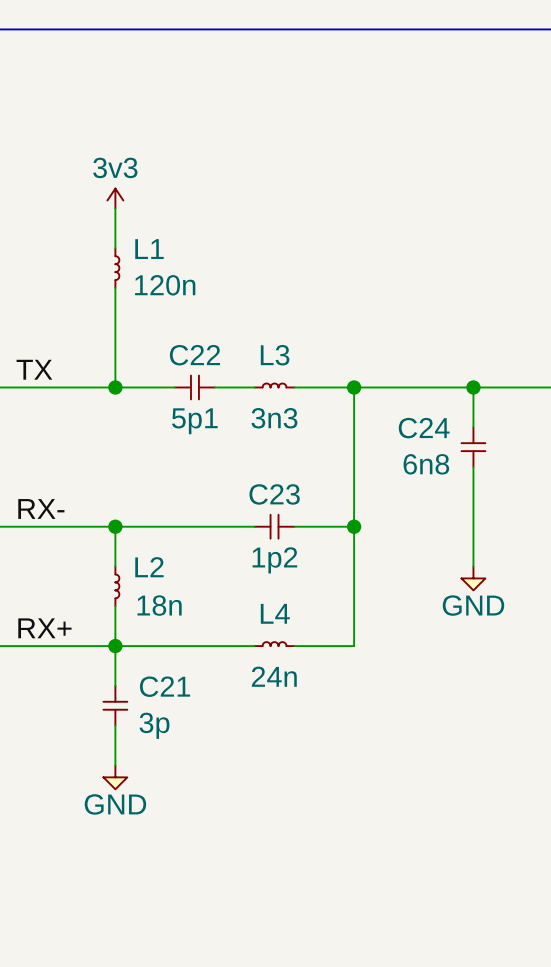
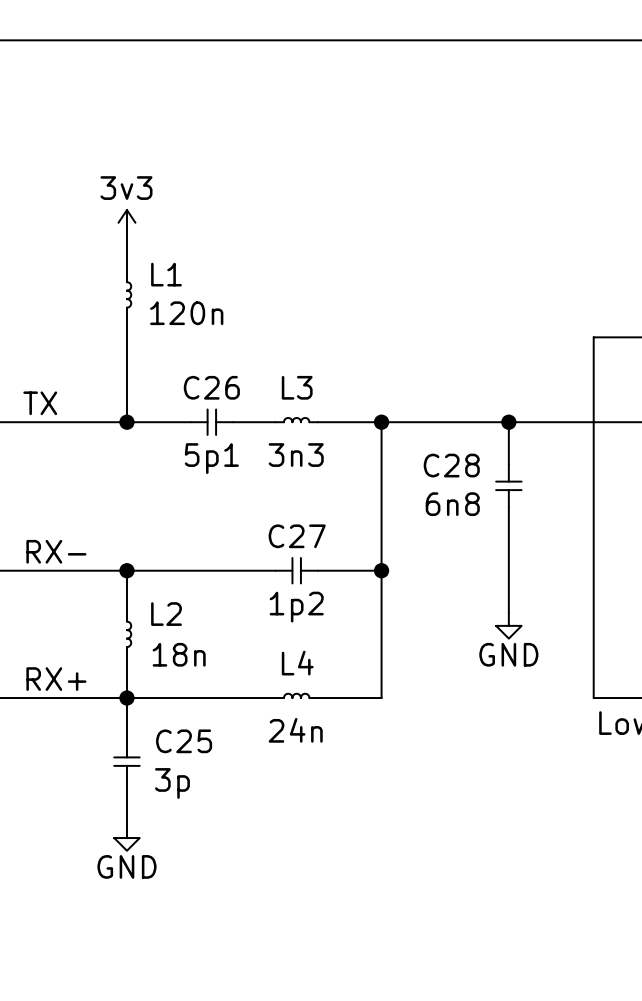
C22 name: C22 (194, 355) -> C26 (211, 387)
C24 name: C24 (424, 428) -> C28 (451, 465)
C23 name: C23 (274, 494) -> C27 (297, 536)
C21 name: C21 (165, 686) -> C25 (184, 741)

